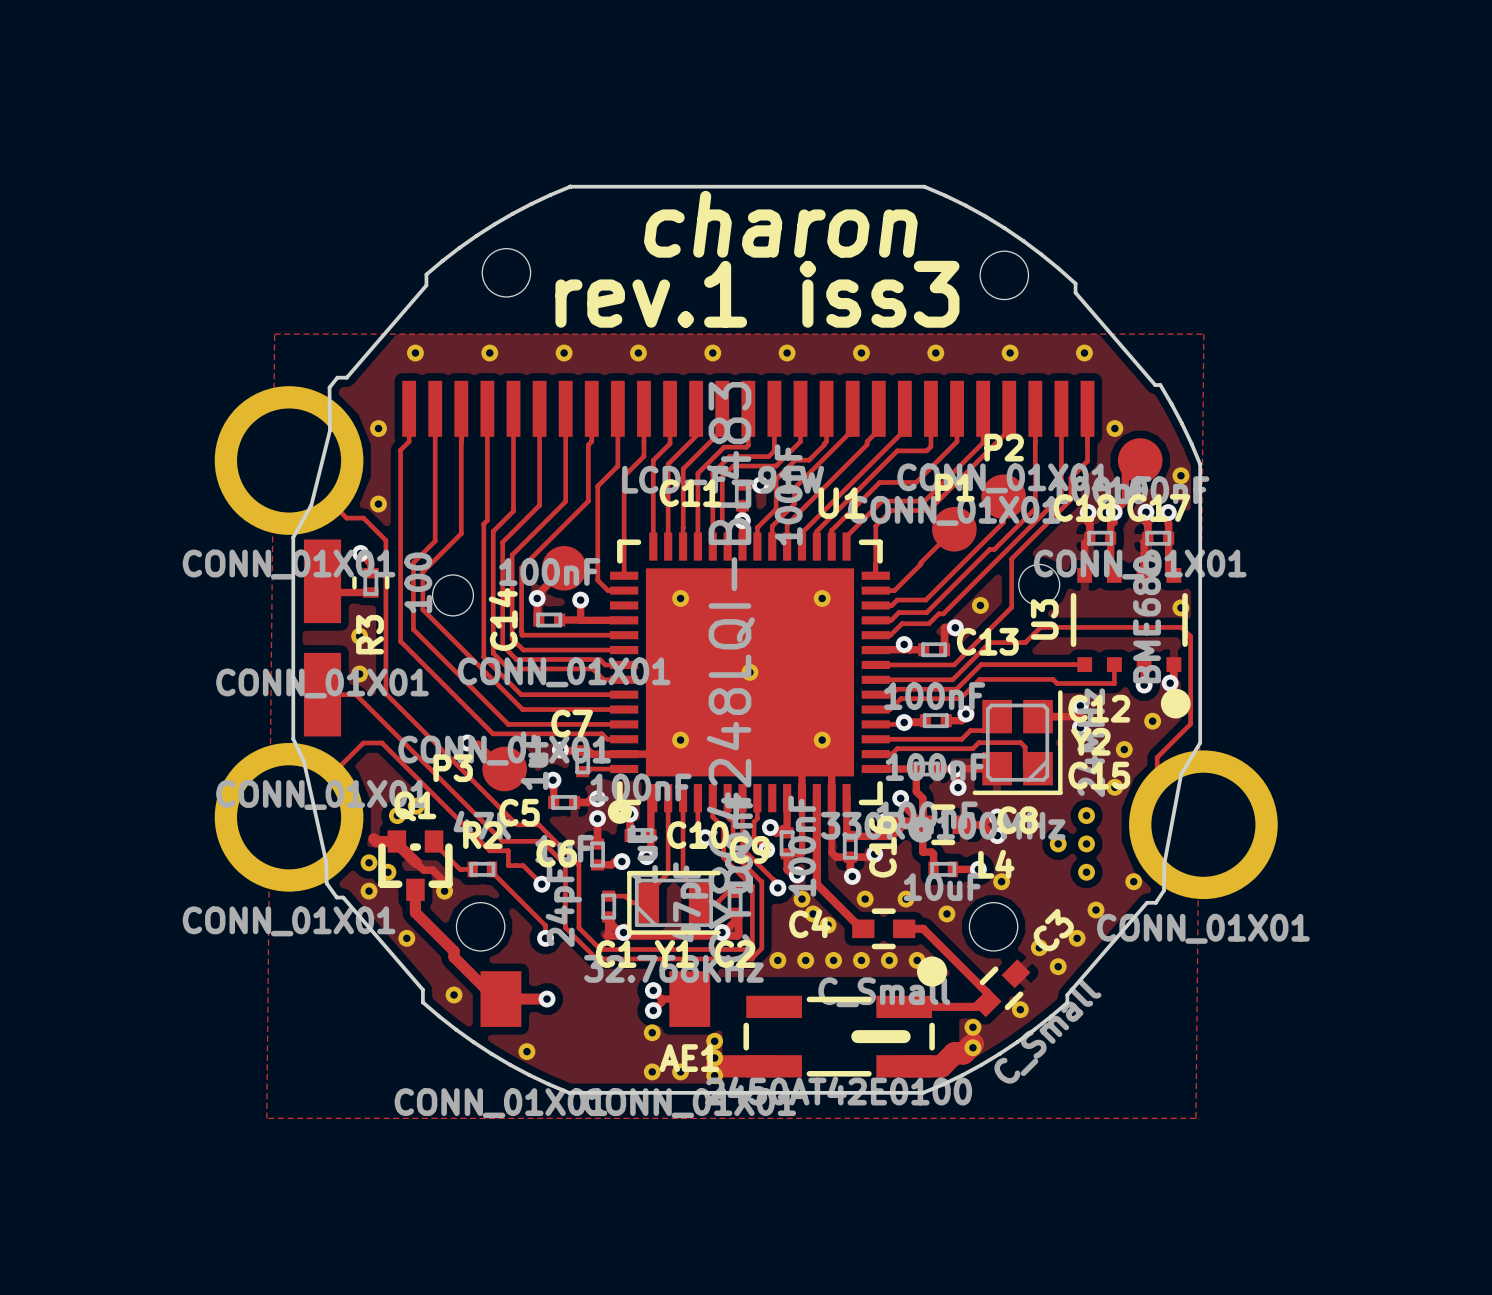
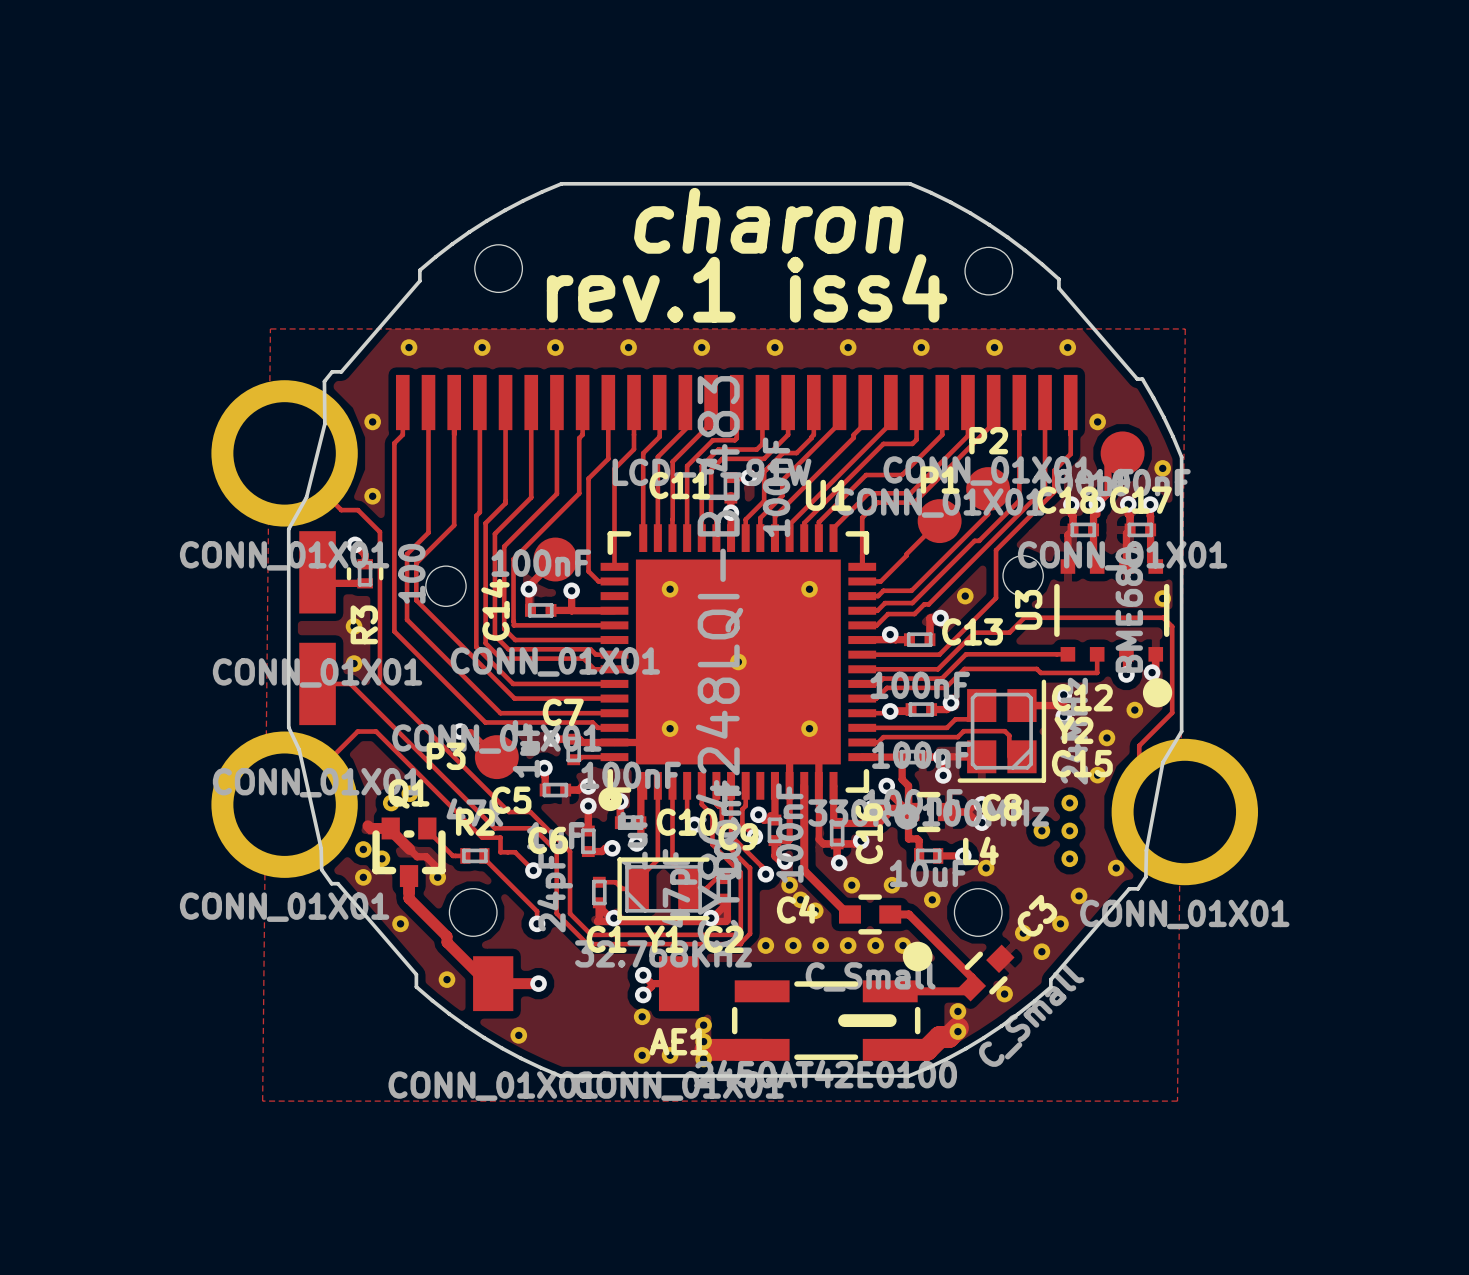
text: rev.1 iss3 (757, 294) -> rev.1 iss4 (747, 288)

